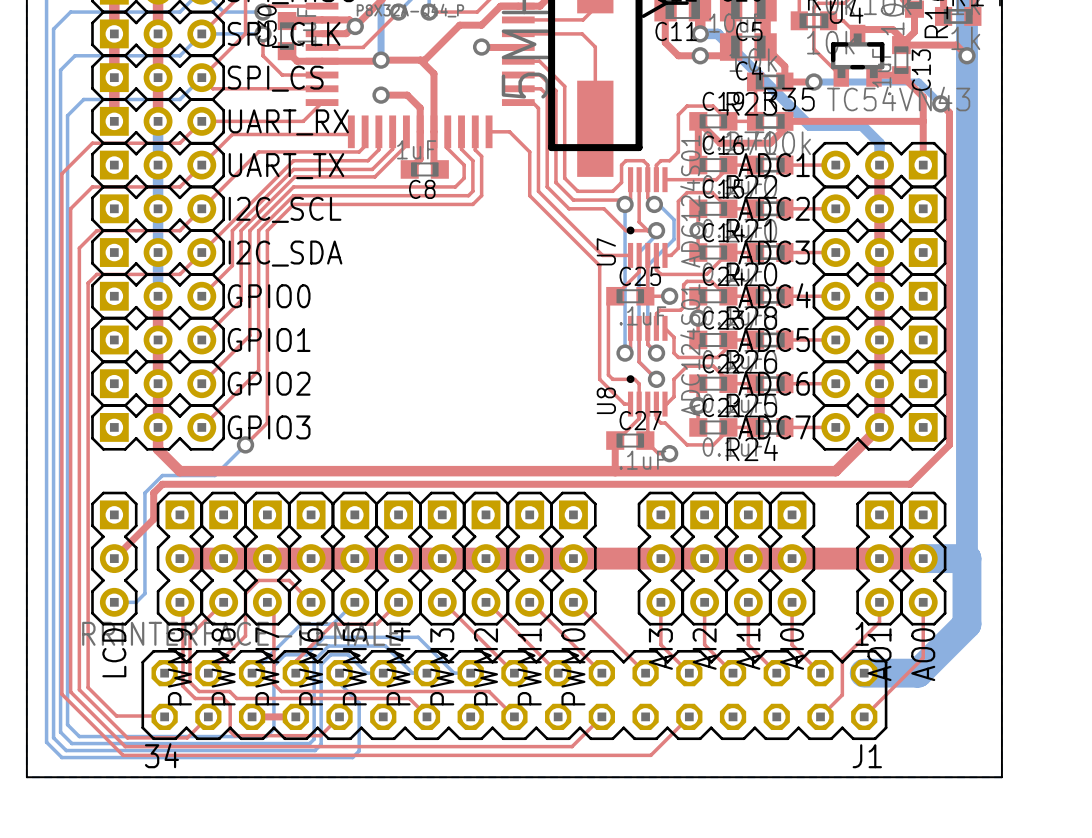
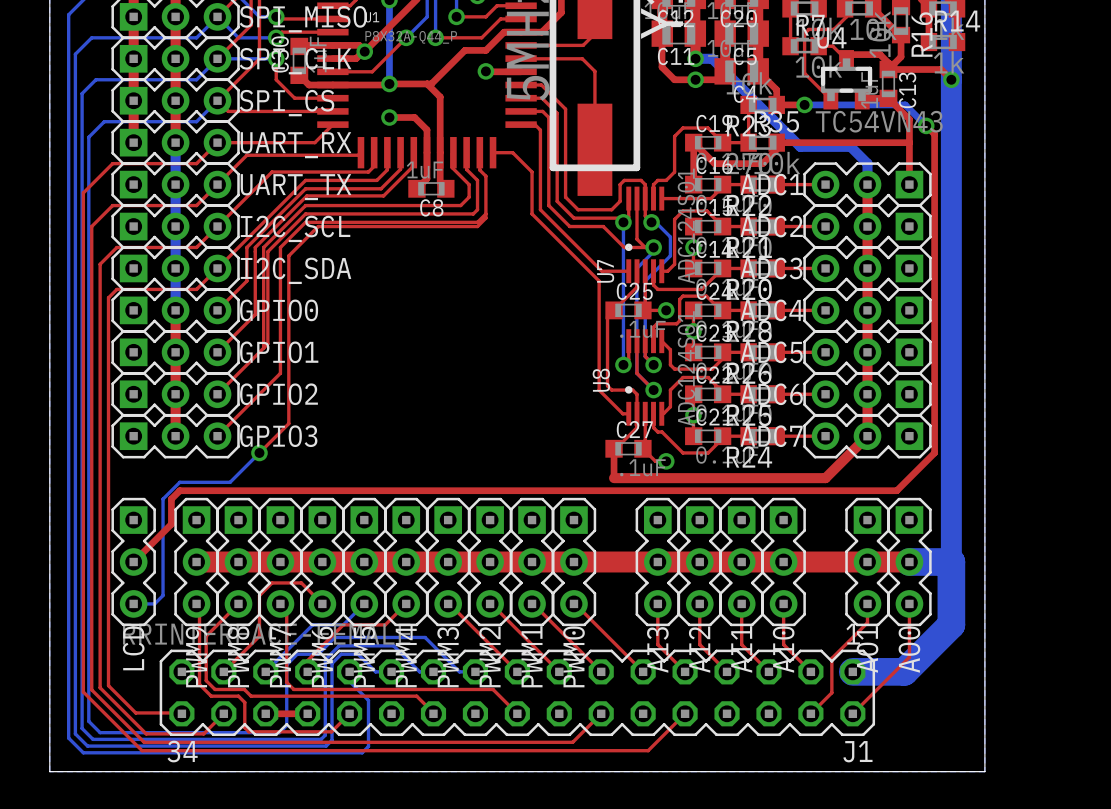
top track: none -> (485, 213) (485, 218) (477, 226) (318, 226) (288, 255) (288, 423) (280, 432)
top track: (258, 230) (258, 370) -> (272, 247) (267, 251) (267, 343) (263, 348)
top track: (267, 361) (267, 423) -> (280, 373) (272, 381)
U8 name position: U8 (606, 400) -> U8 (601, 380)
top track: (158, 427) (158, 449) (179, 471) (615, 471) -> none

